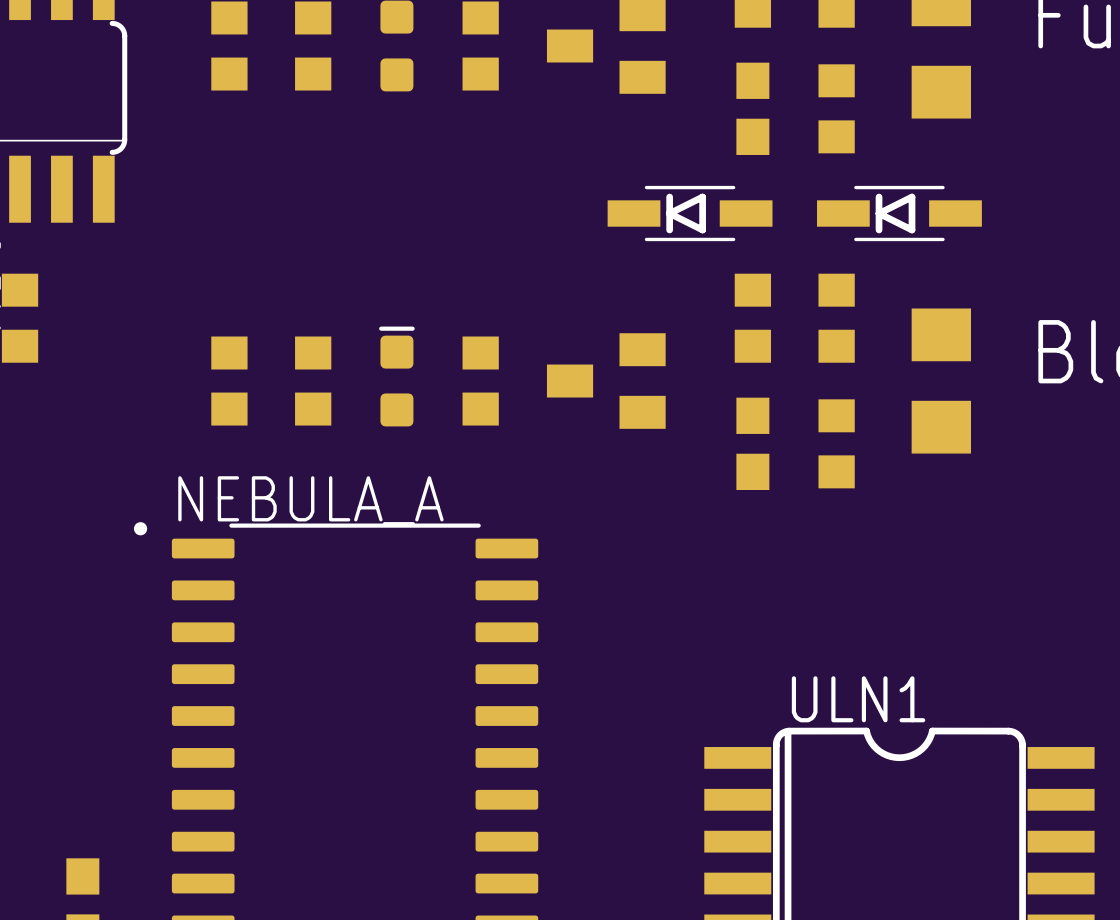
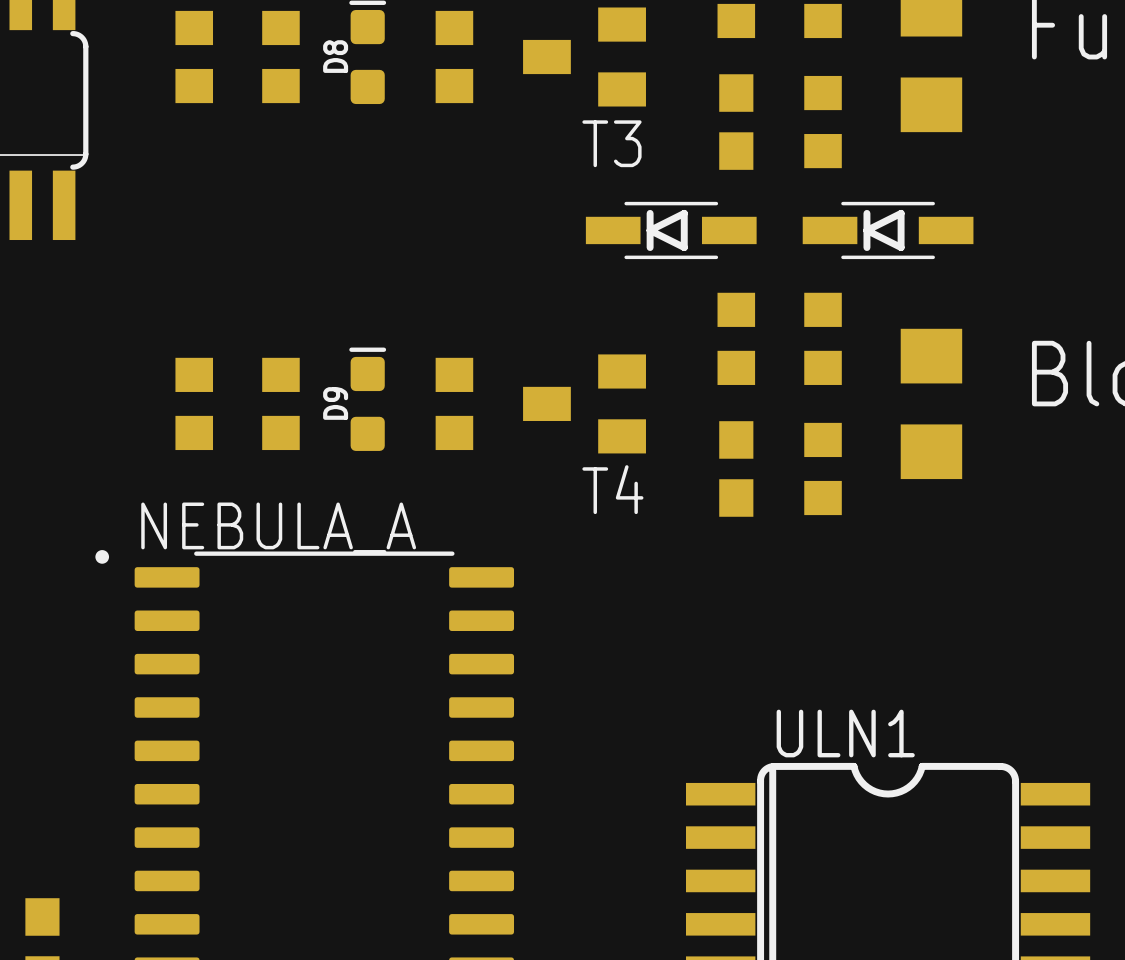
D8 name: none -> D8 (335, 56)
T3 name: none -> T3 (611, 143)
D9 name: none -> D9 (335, 403)
T4 name: none -> T4 (612, 489)

